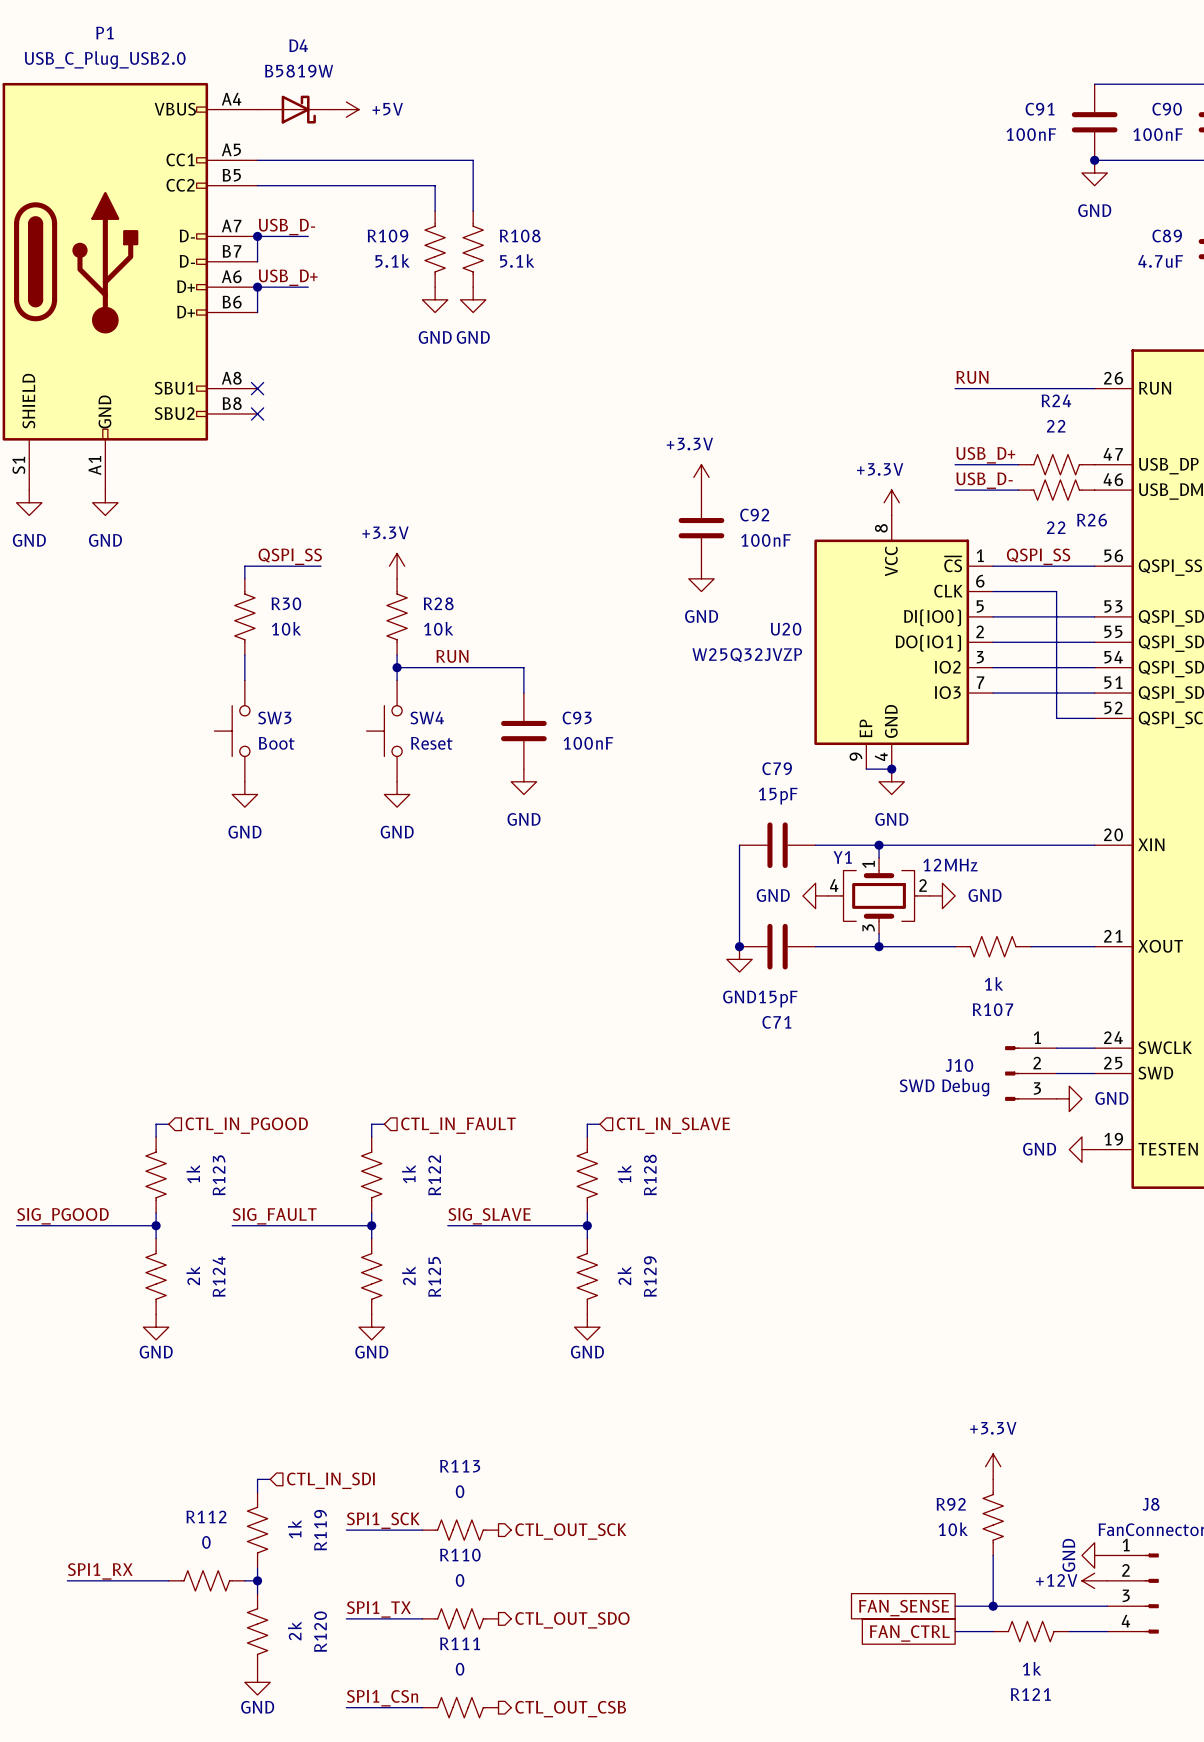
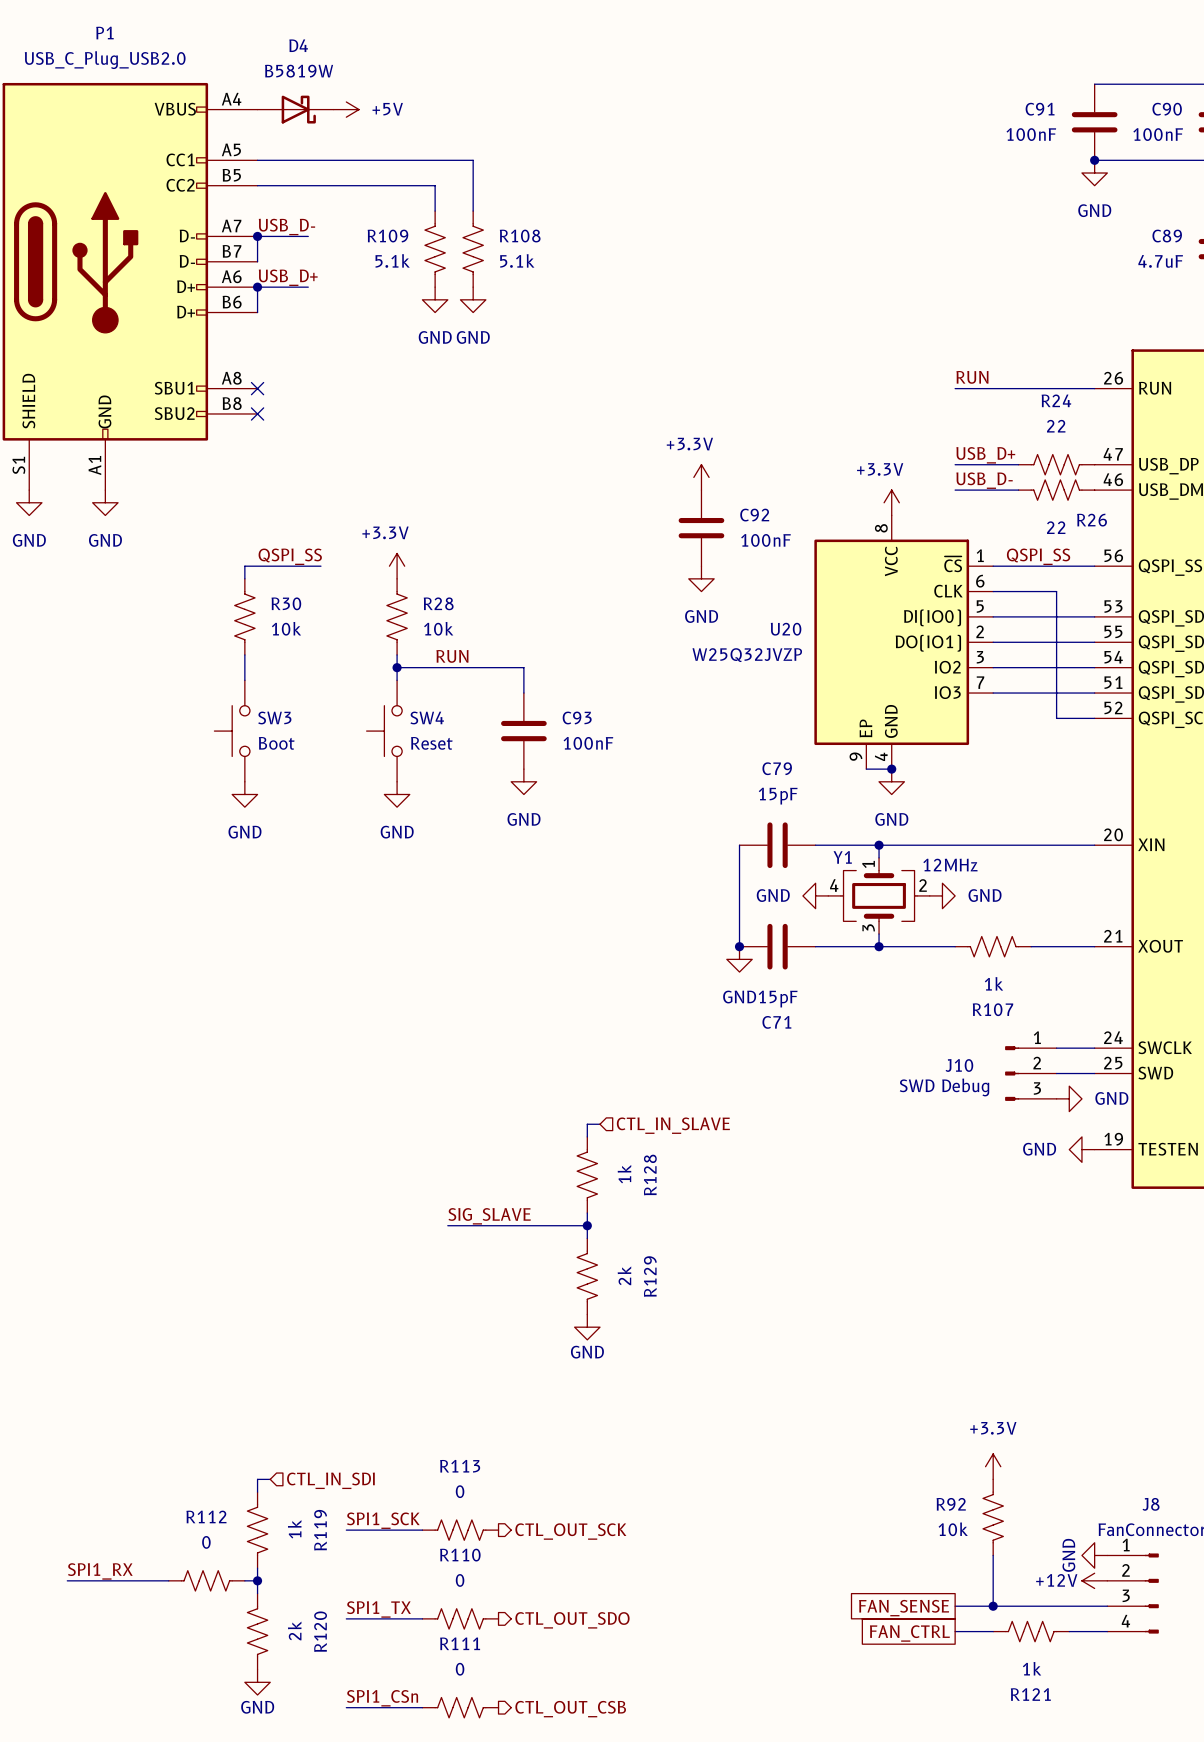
wire: (168, 1124) (156, 1124) (156, 1136) -> none
wire: (384, 1124) (371, 1124) (371, 1136) -> none
hierarchical label: CTL_IN_PGOOD (246, 1125) -> none
hierarchical label: CTL_IN_FAULT (458, 1125) -> none
R123: 1k (156, 1174) -> none
R122: 1k (371, 1174) -> none
wire: (156, 1213) (156, 1238) -> none
wire: (371, 1213) (371, 1238) -> none
label: SIG_PGOOD (62, 1216) -> none
label: SIG_FAULT (274, 1216) -> none
wire: (16, 1225) (156, 1225) -> none
junction: (156, 1225) -> none
wire: (232, 1225) (371, 1225) -> none
junction: (371, 1225) -> none
R124: 2k (156, 1276) -> none
R125: 2k (371, 1276) -> none
power symbol: GND (156, 1327) -> none
power symbol: GND (371, 1327) -> none

